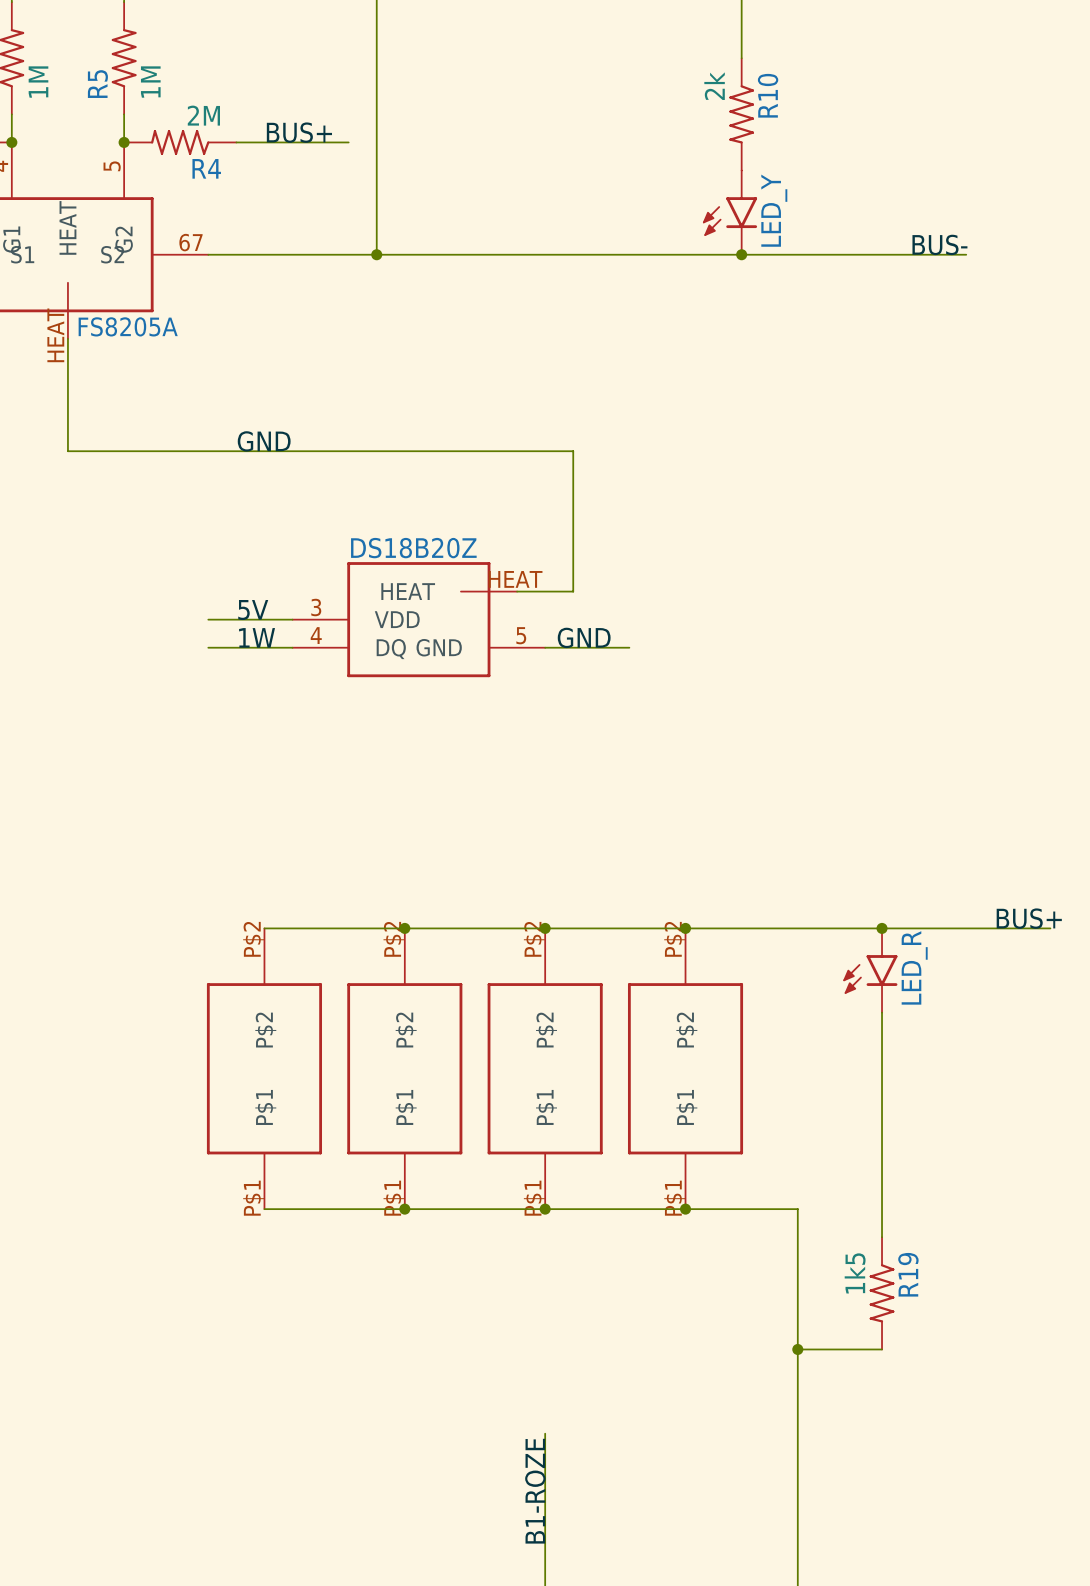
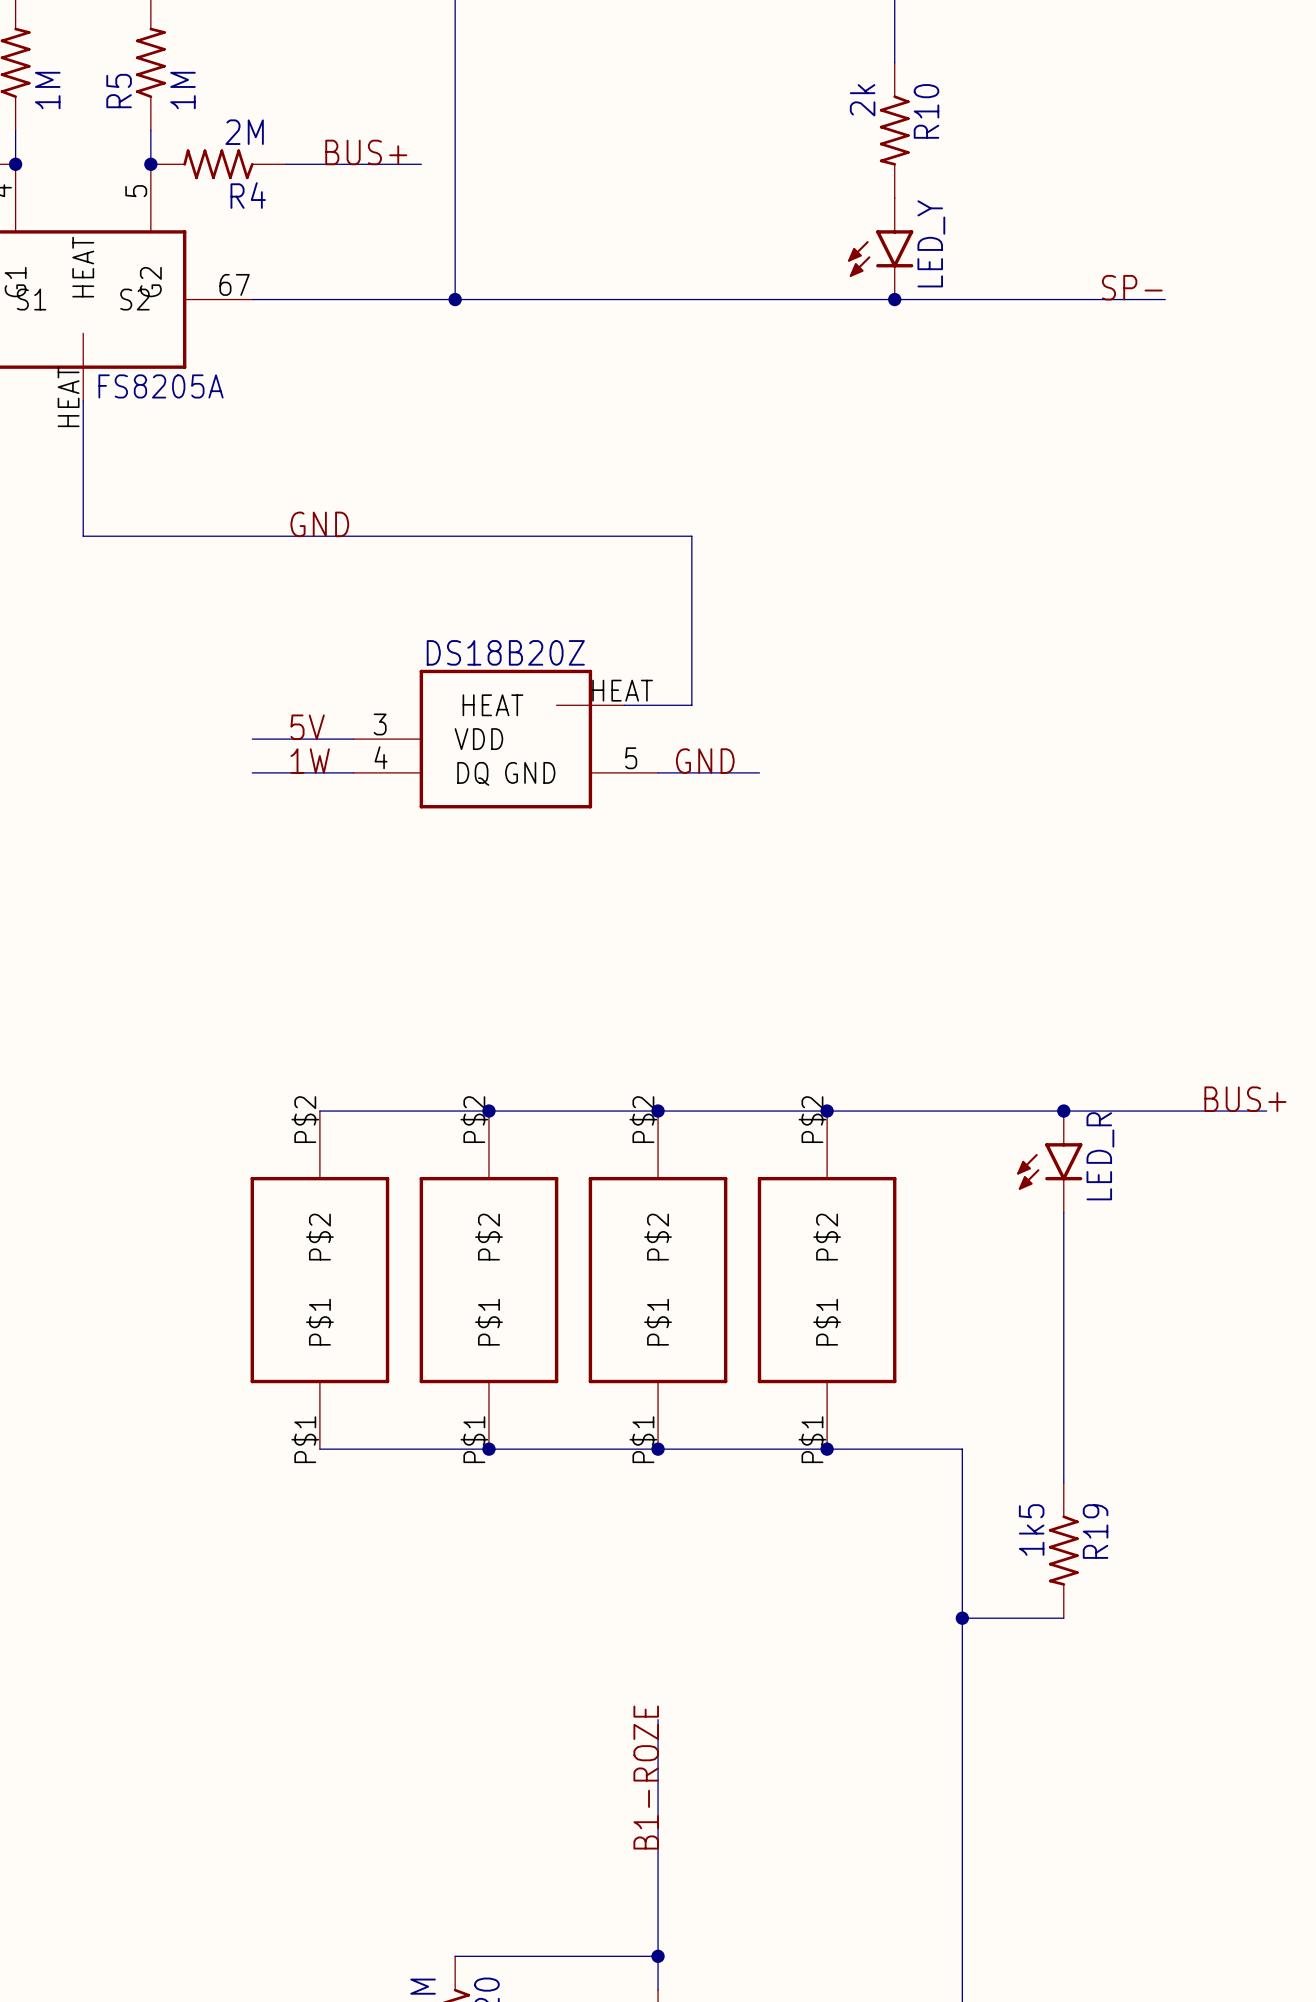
label: BUS- (939, 244) -> SP- (1132, 287)

